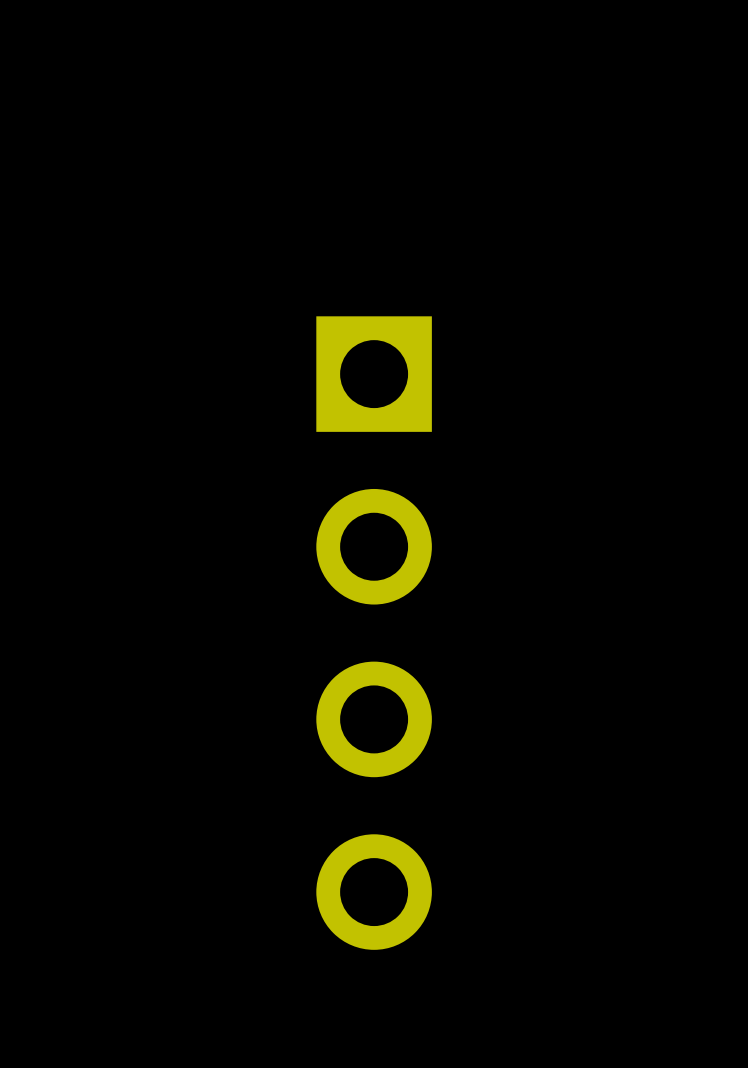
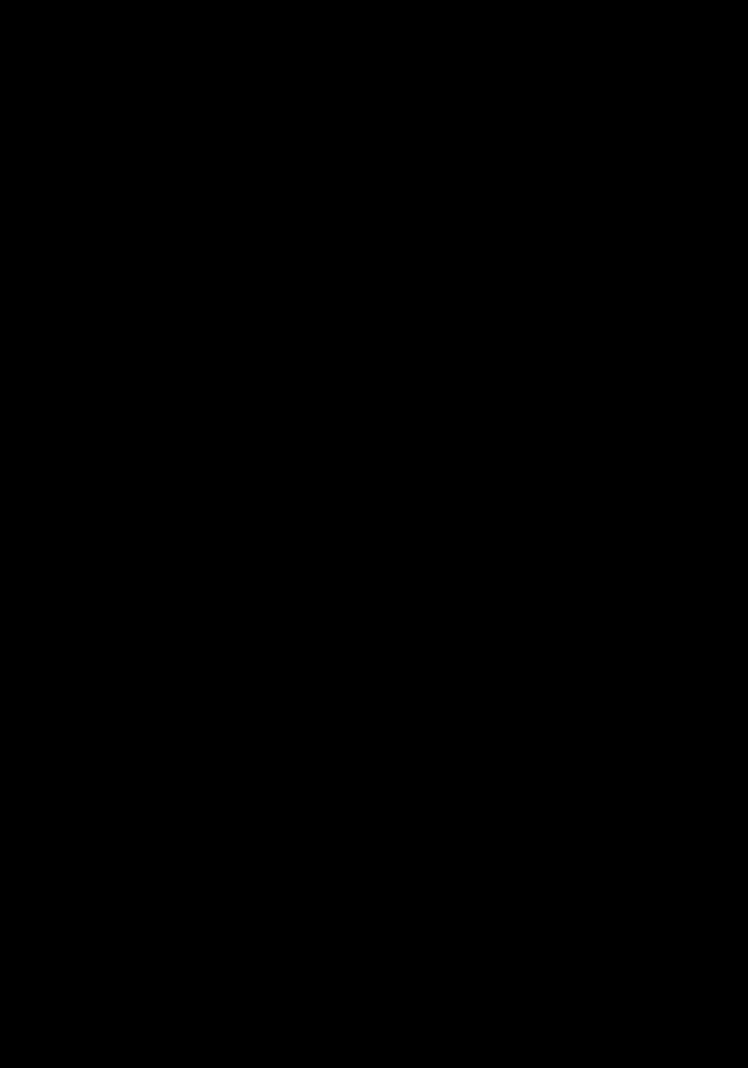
part: (374, 633) -> none

